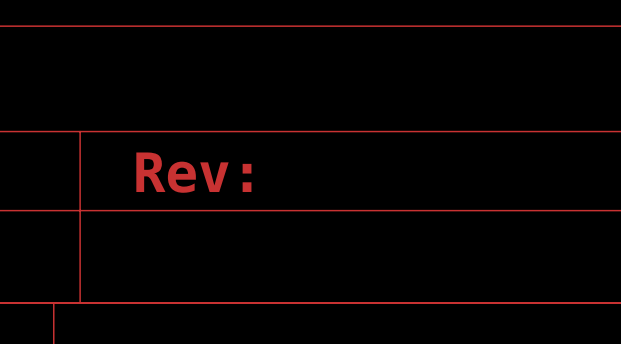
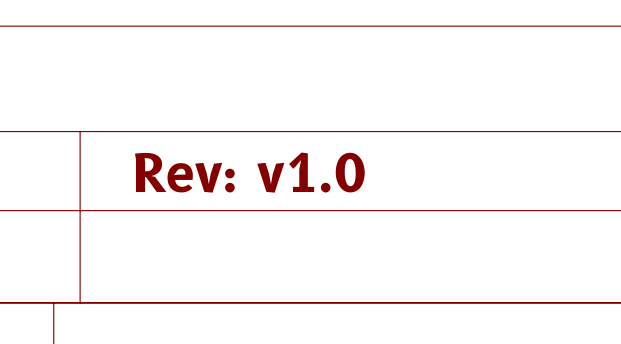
title block: Rev: (193, 172) -> Rev: v1.0 (249, 172)

